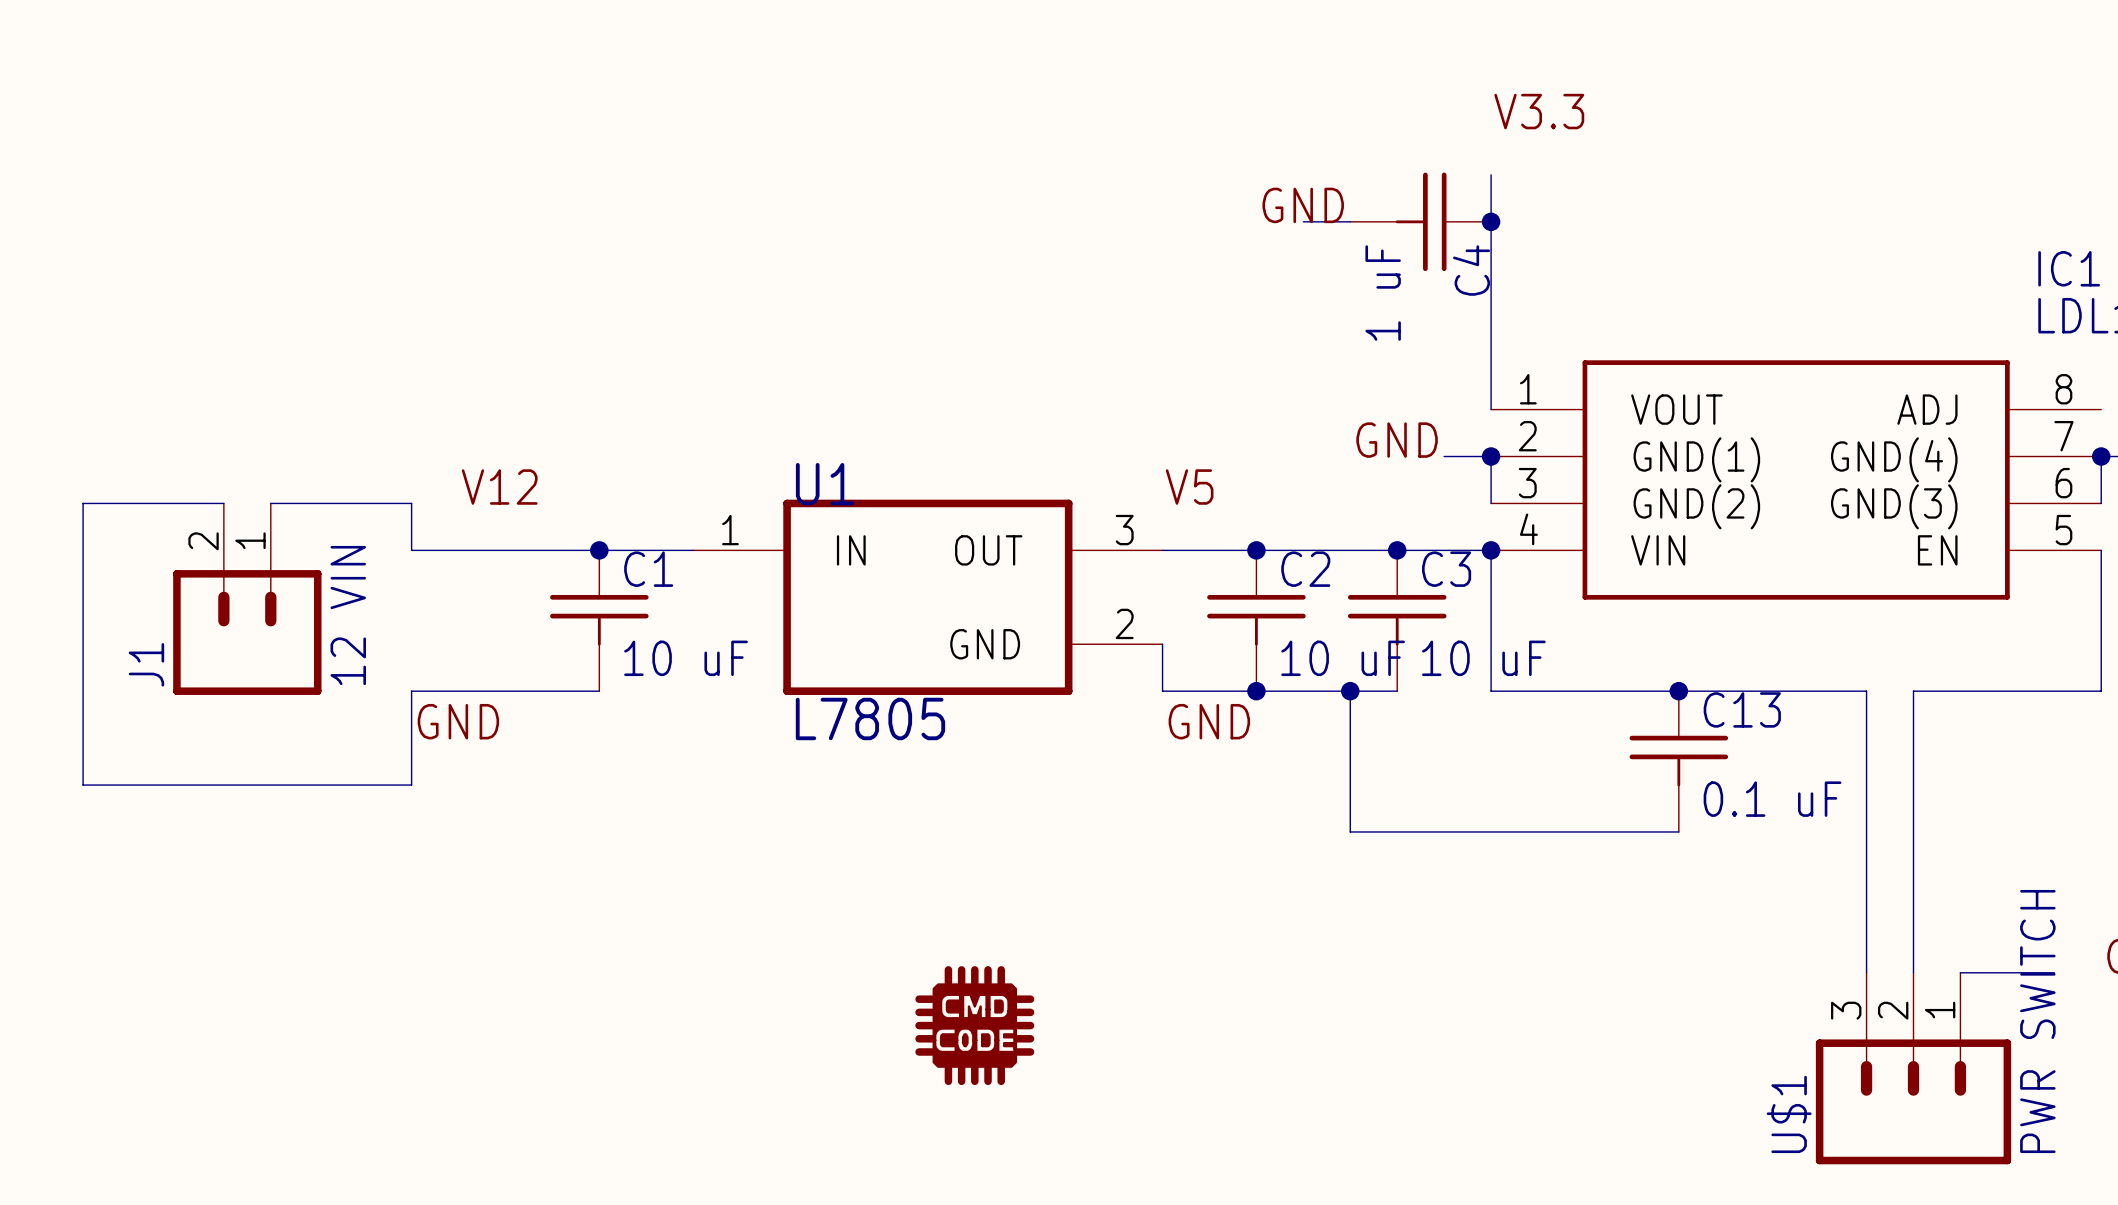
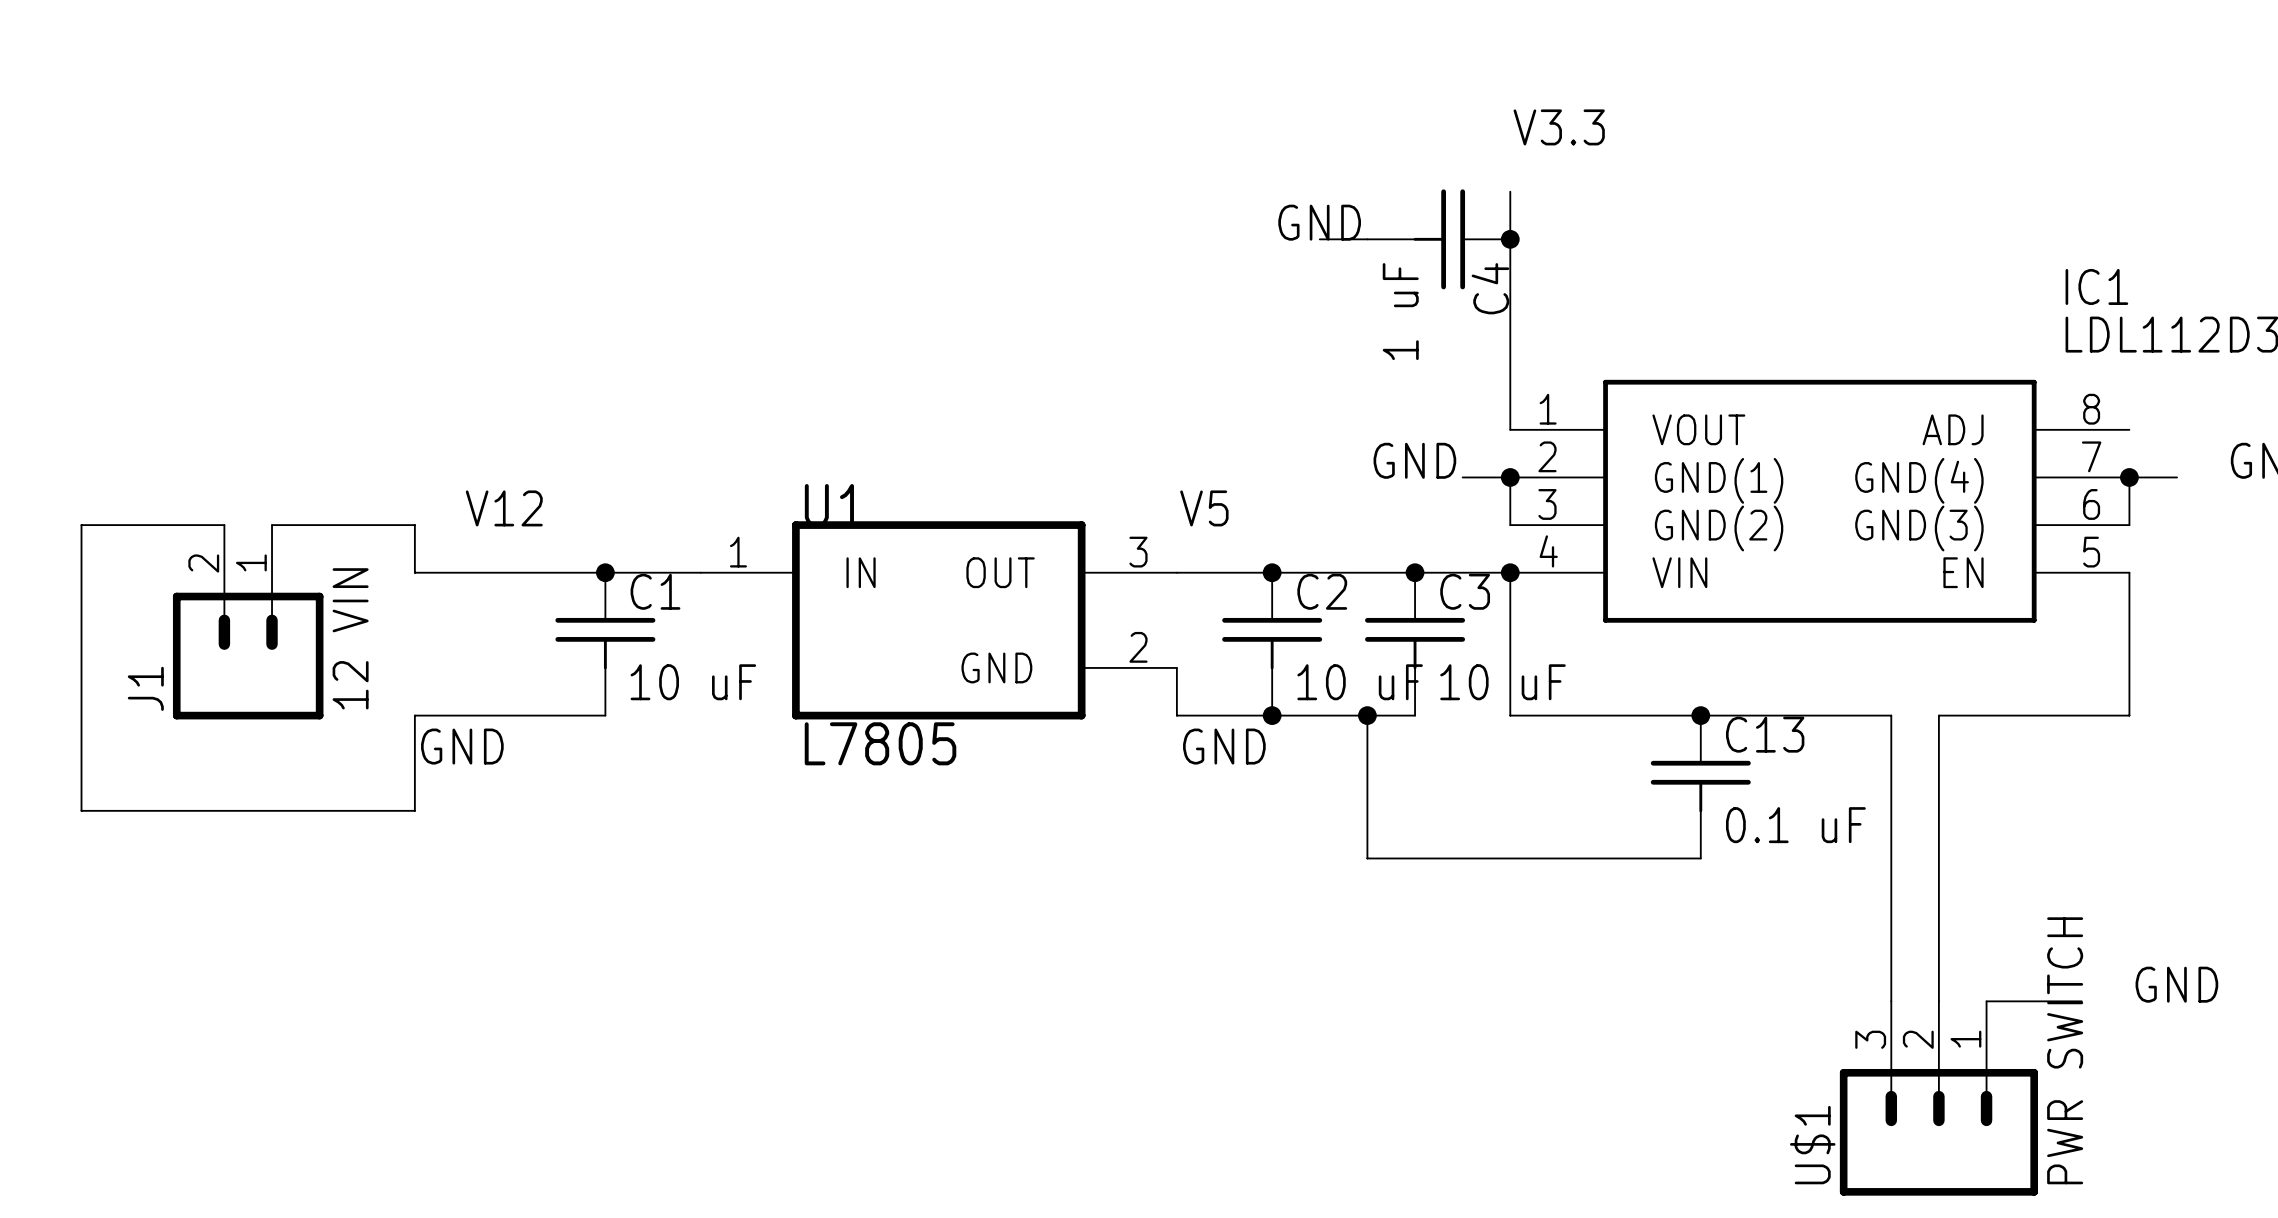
part: (974, 1025) -> none

